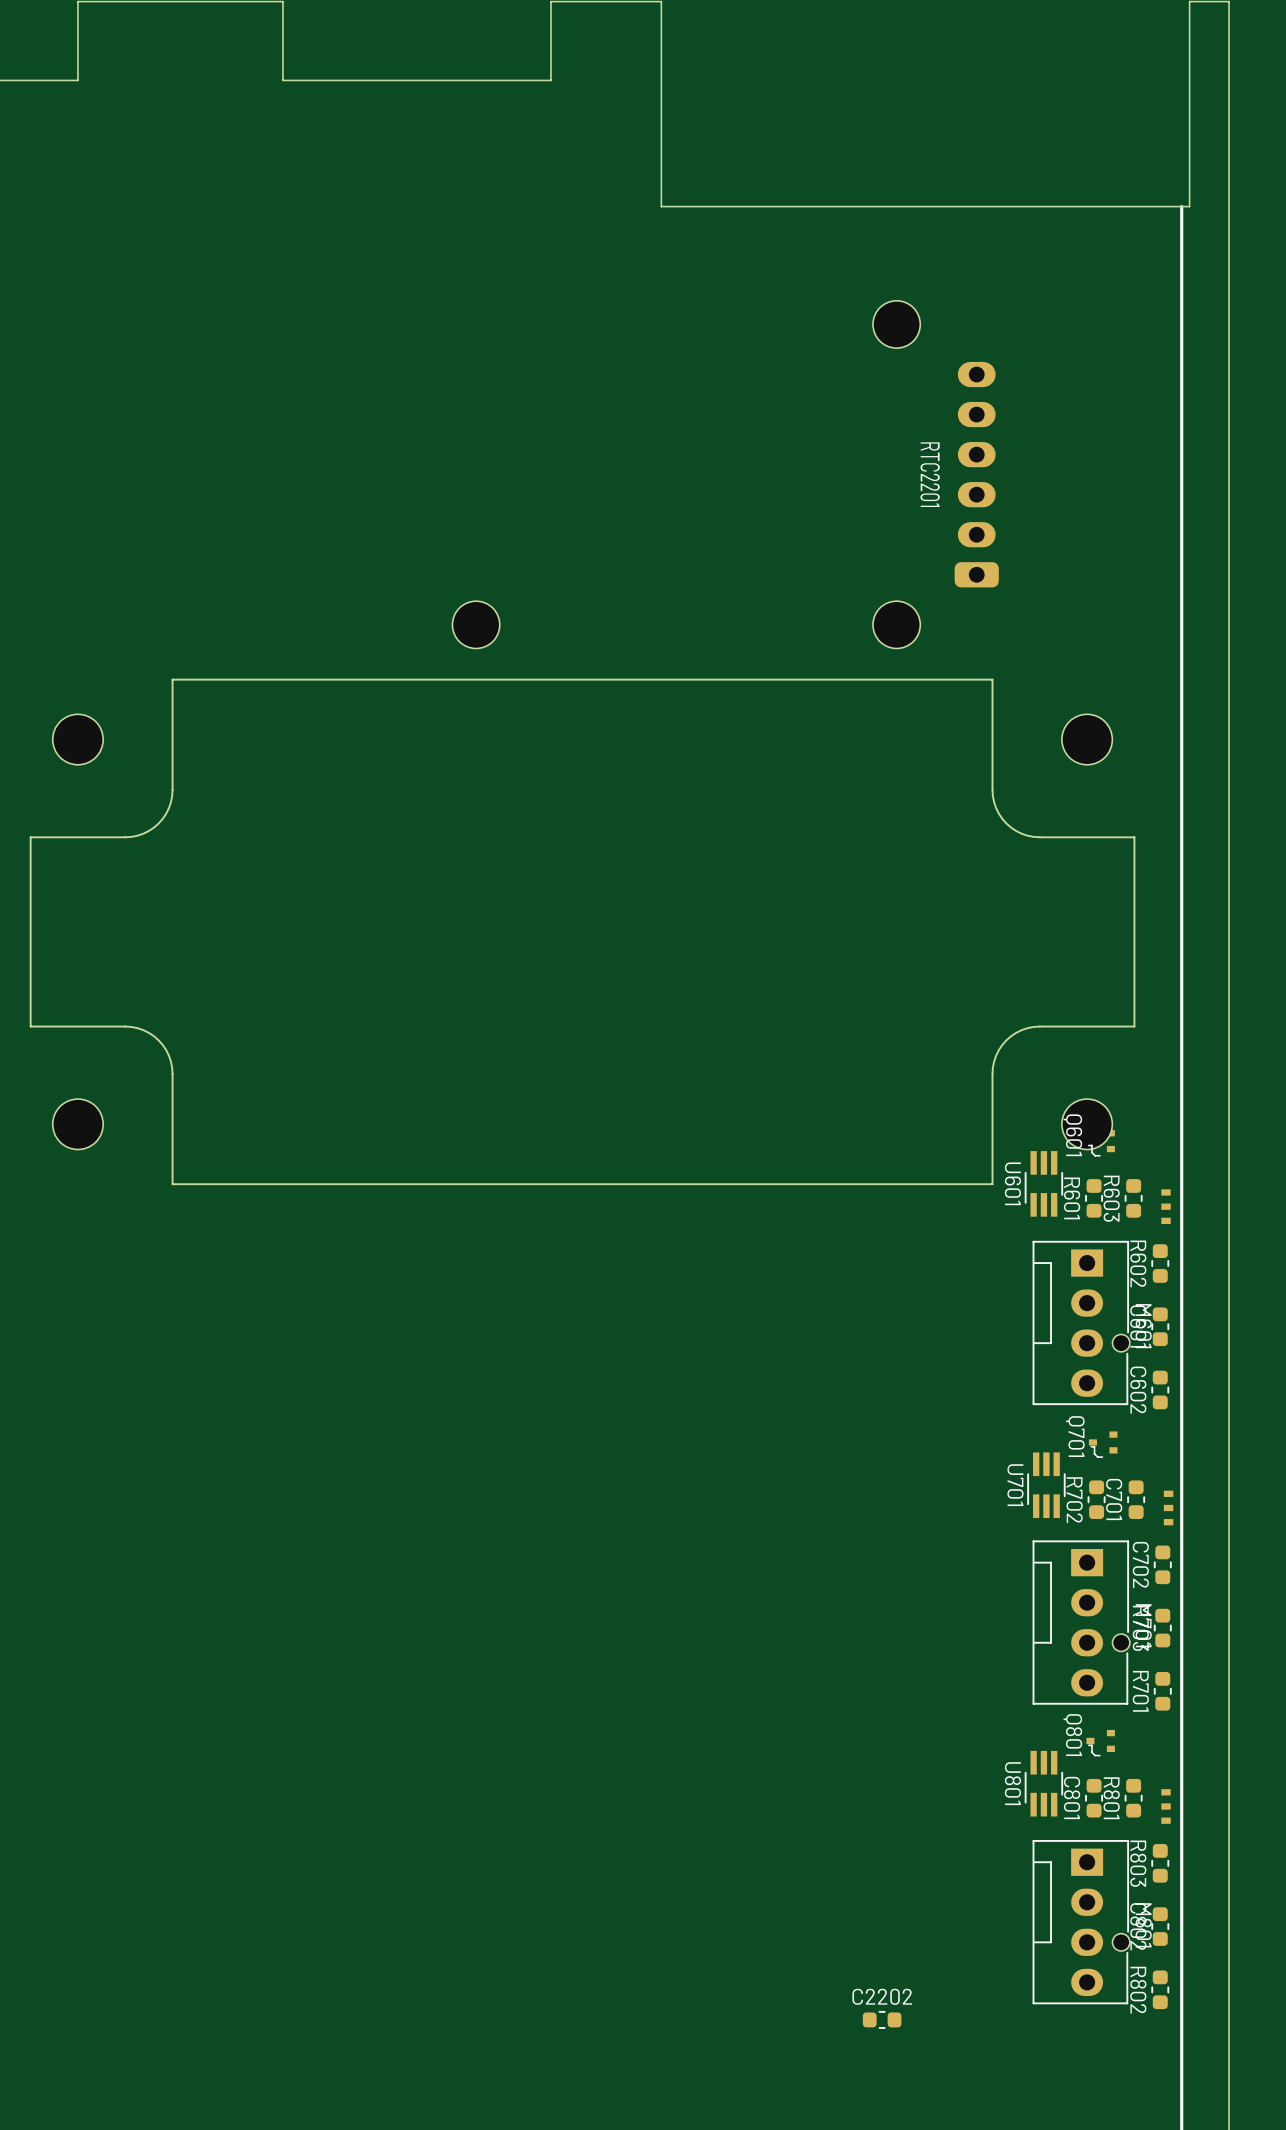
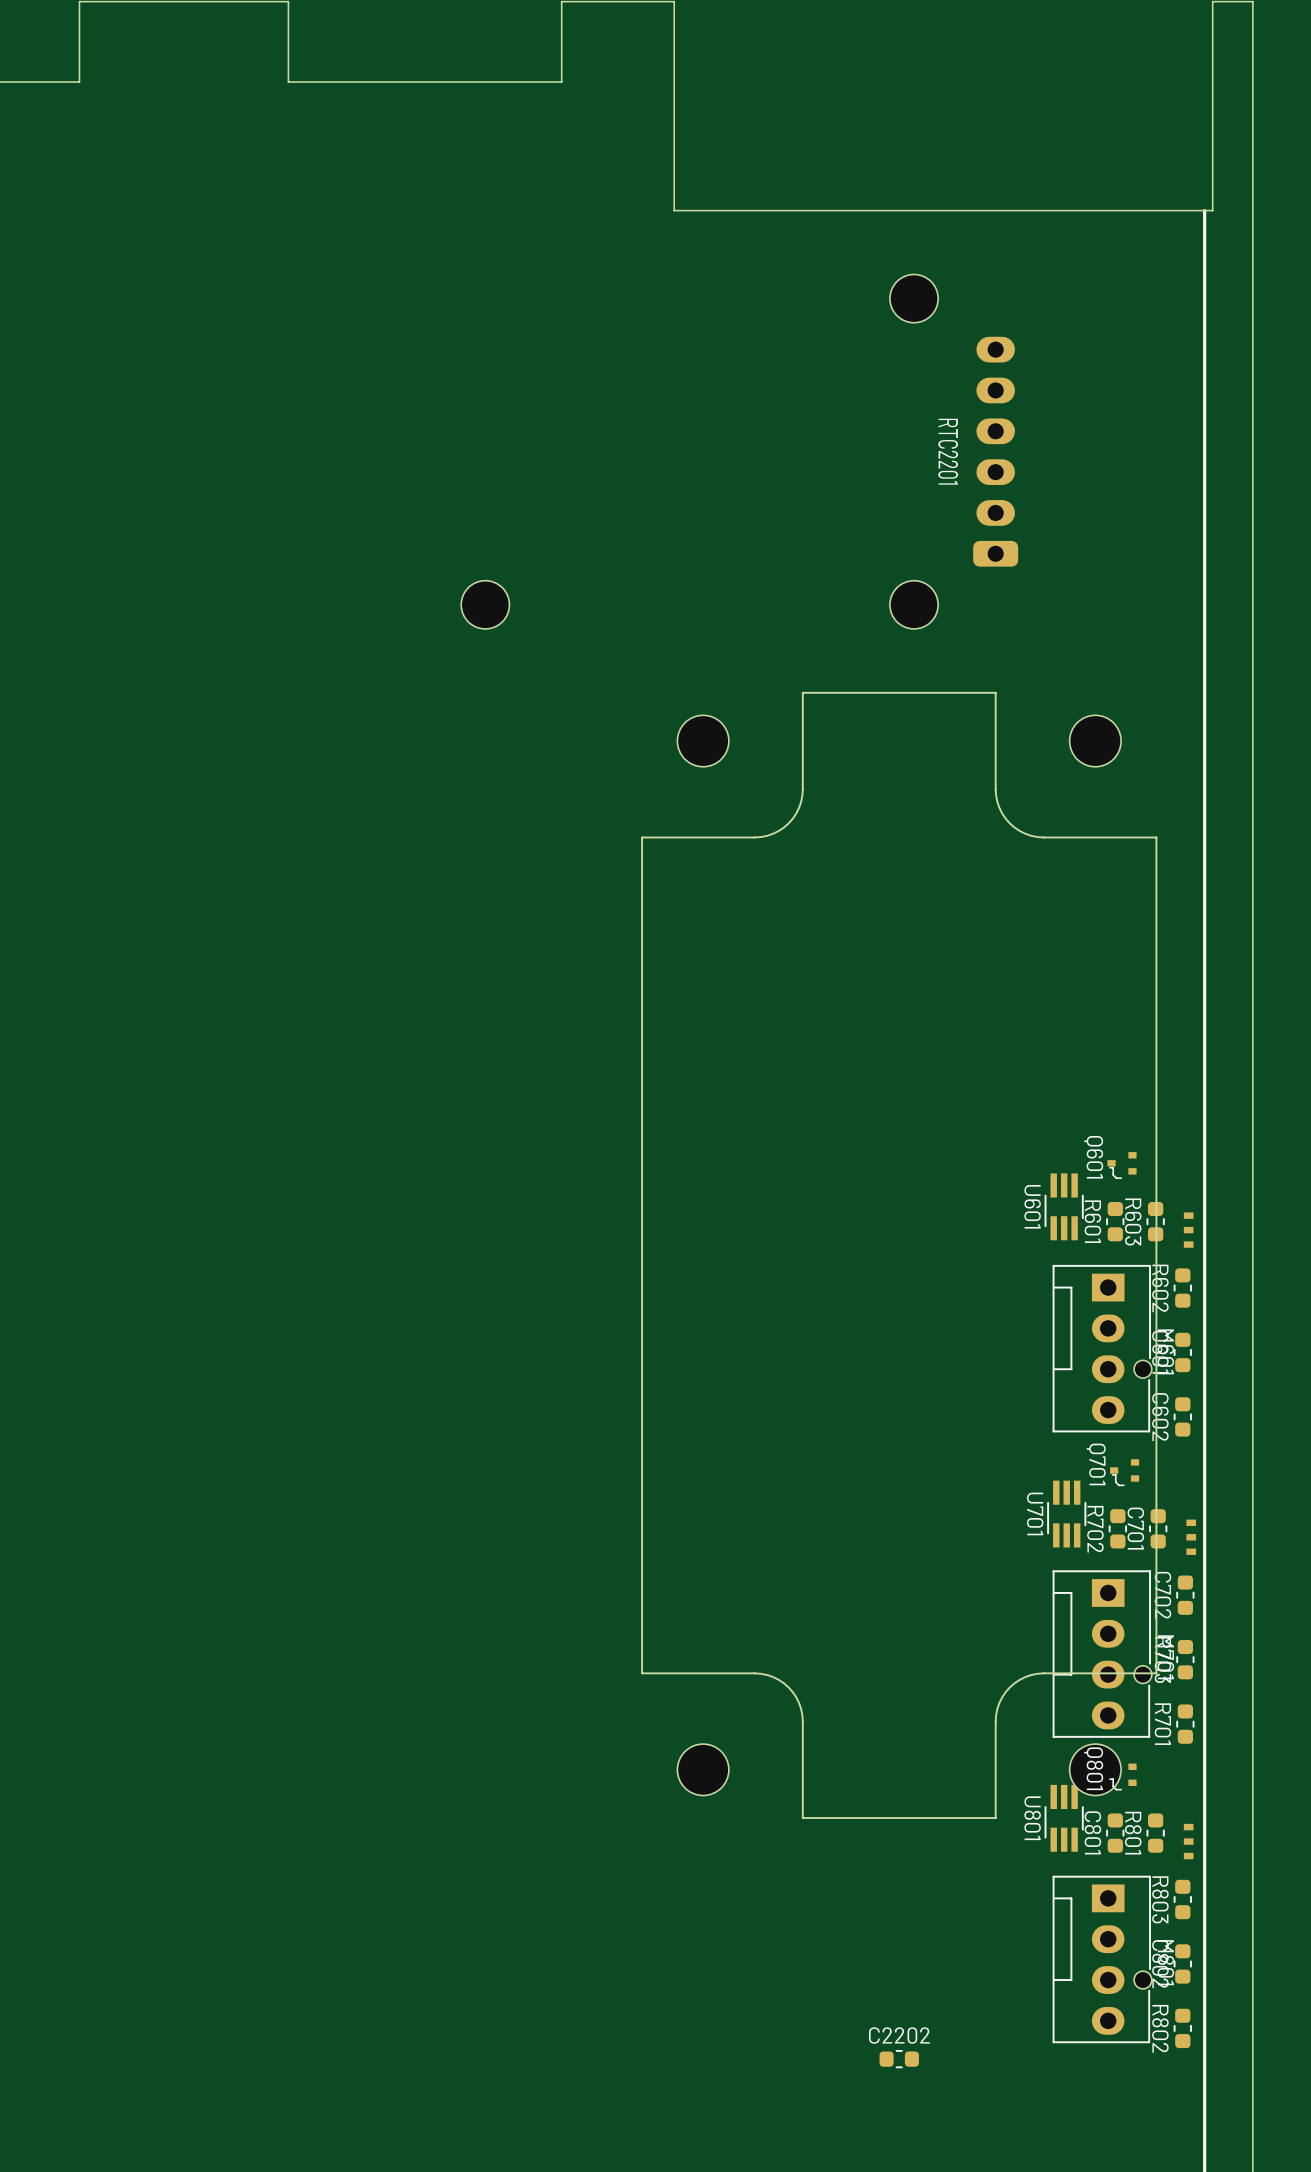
RTC2201 position: (725, 474) -> (739, 451)
part: (582, 931) -> none
part: none -> (899, 1255)

